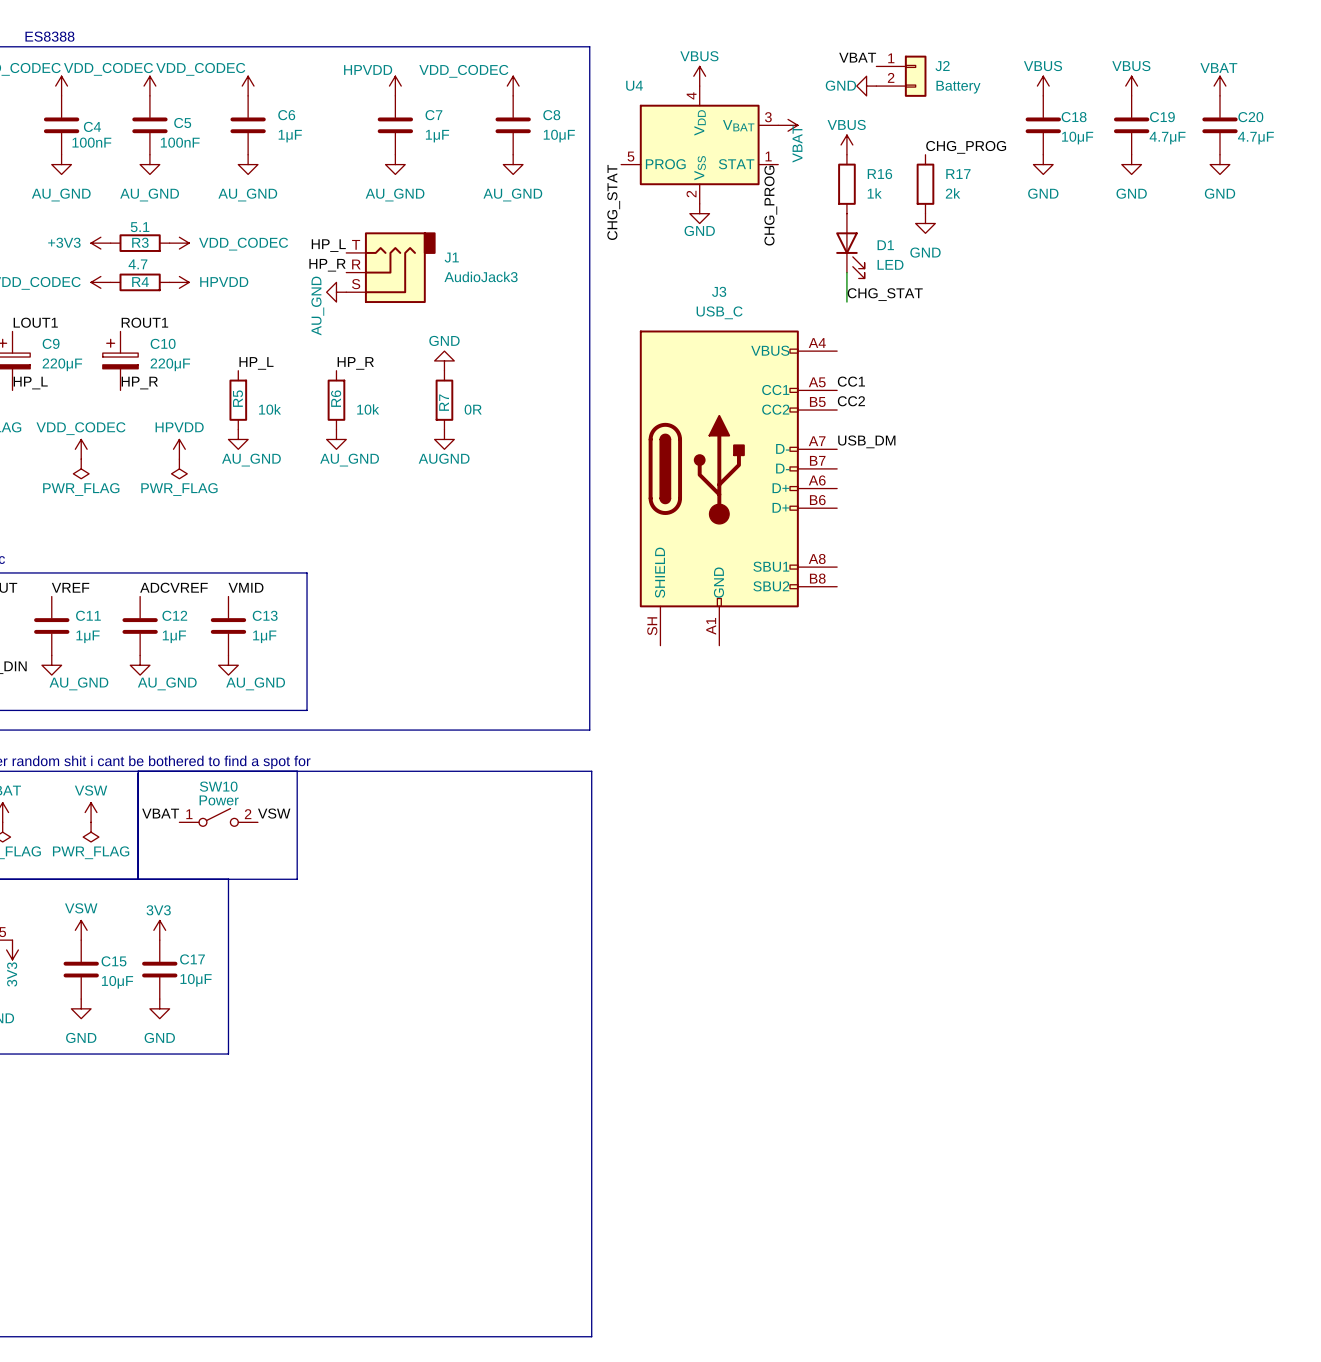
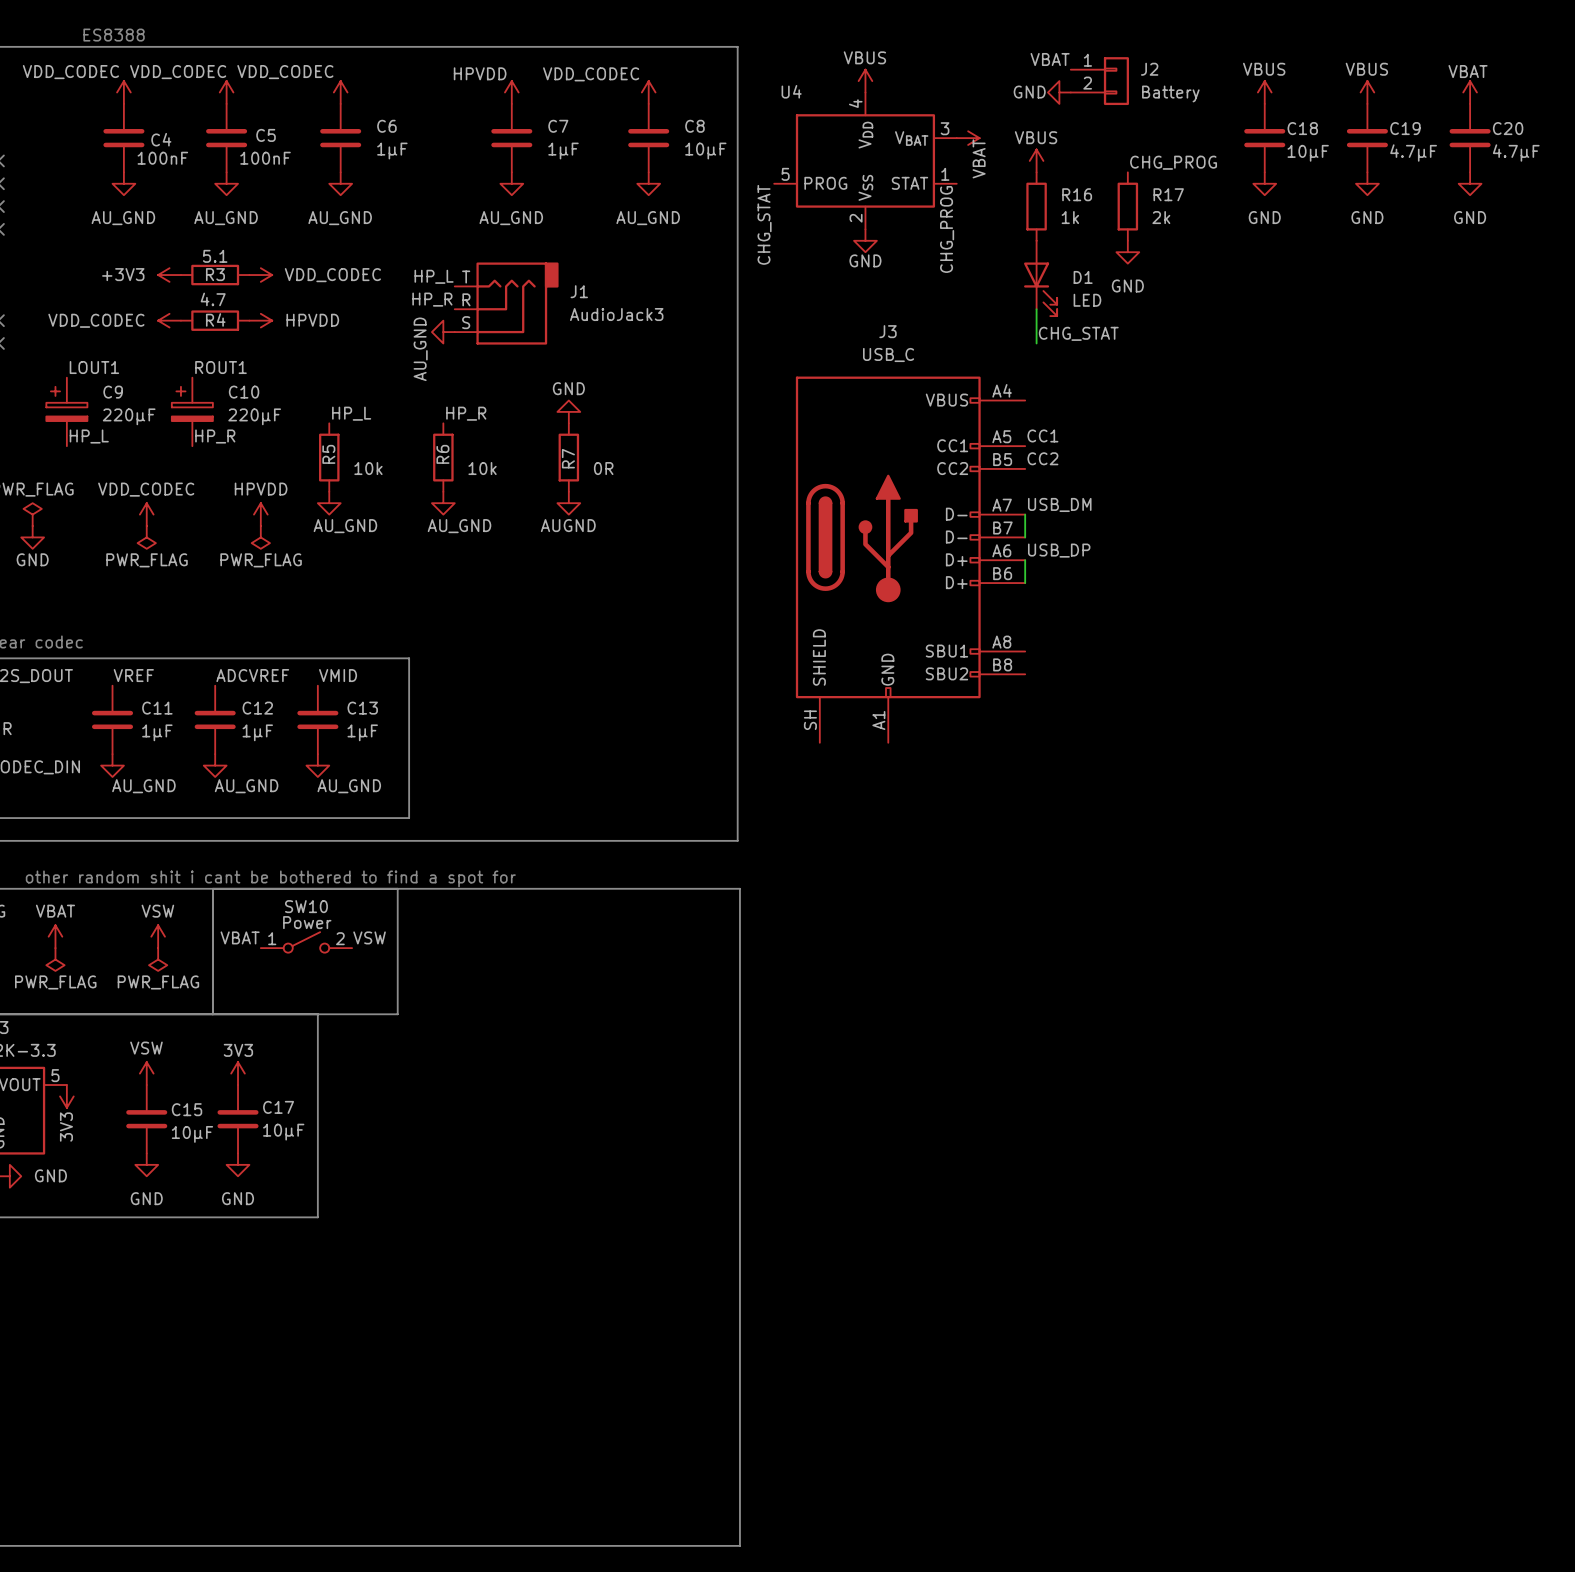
wire: none -> (1025, 514) (1025, 537)
label: none -> USB_DP (1059, 550)
wire: none -> (1025, 560) (1025, 583)

